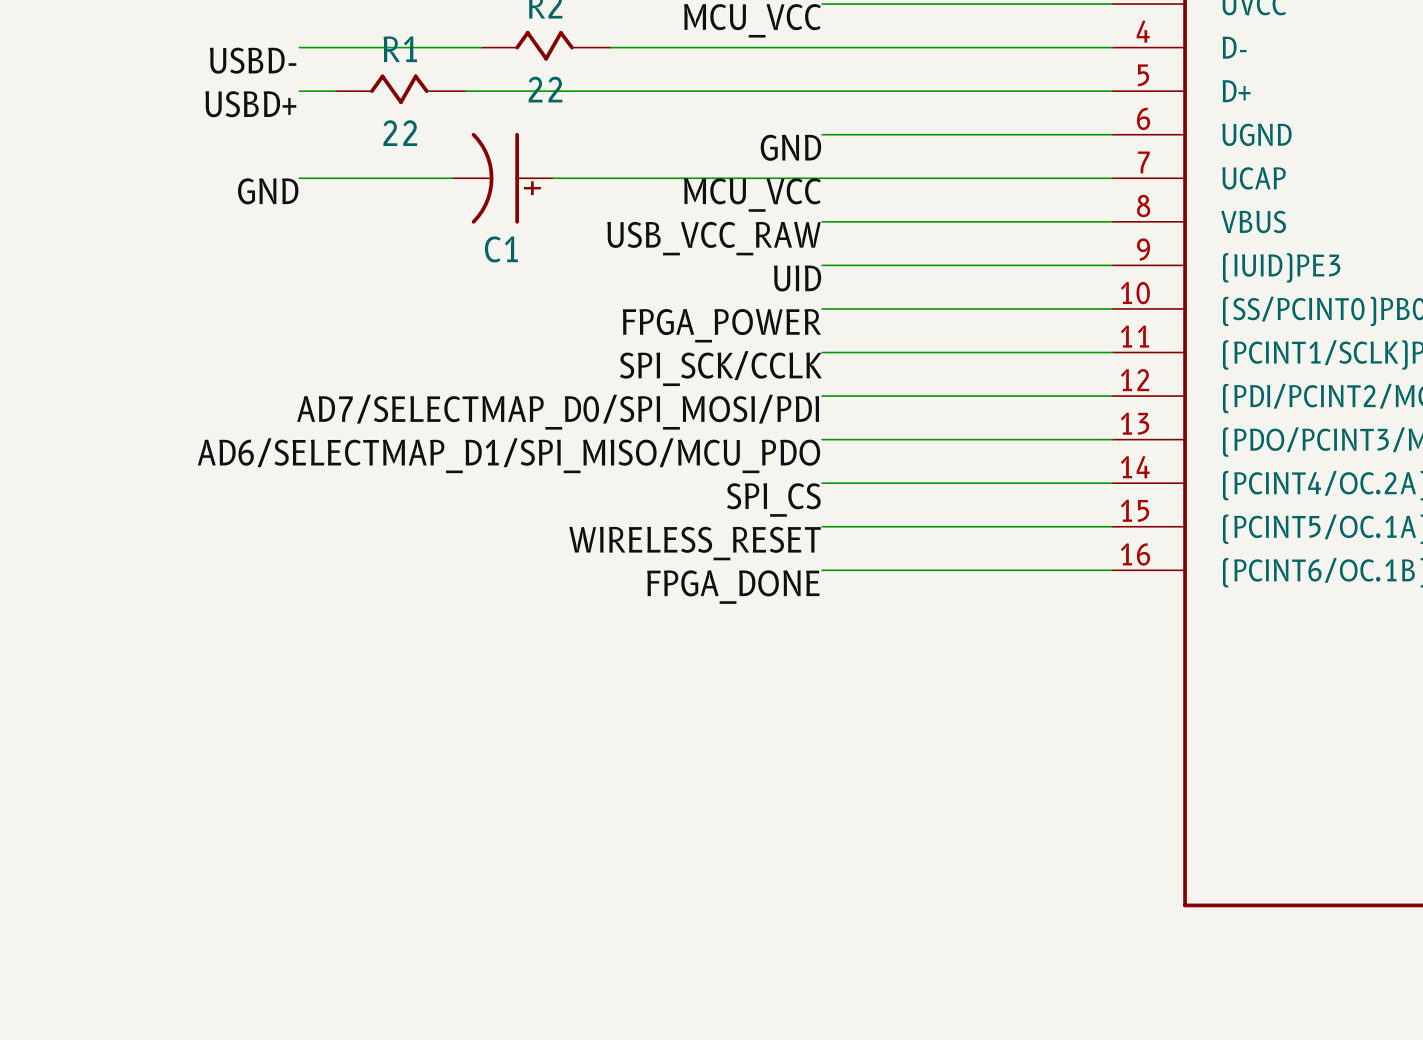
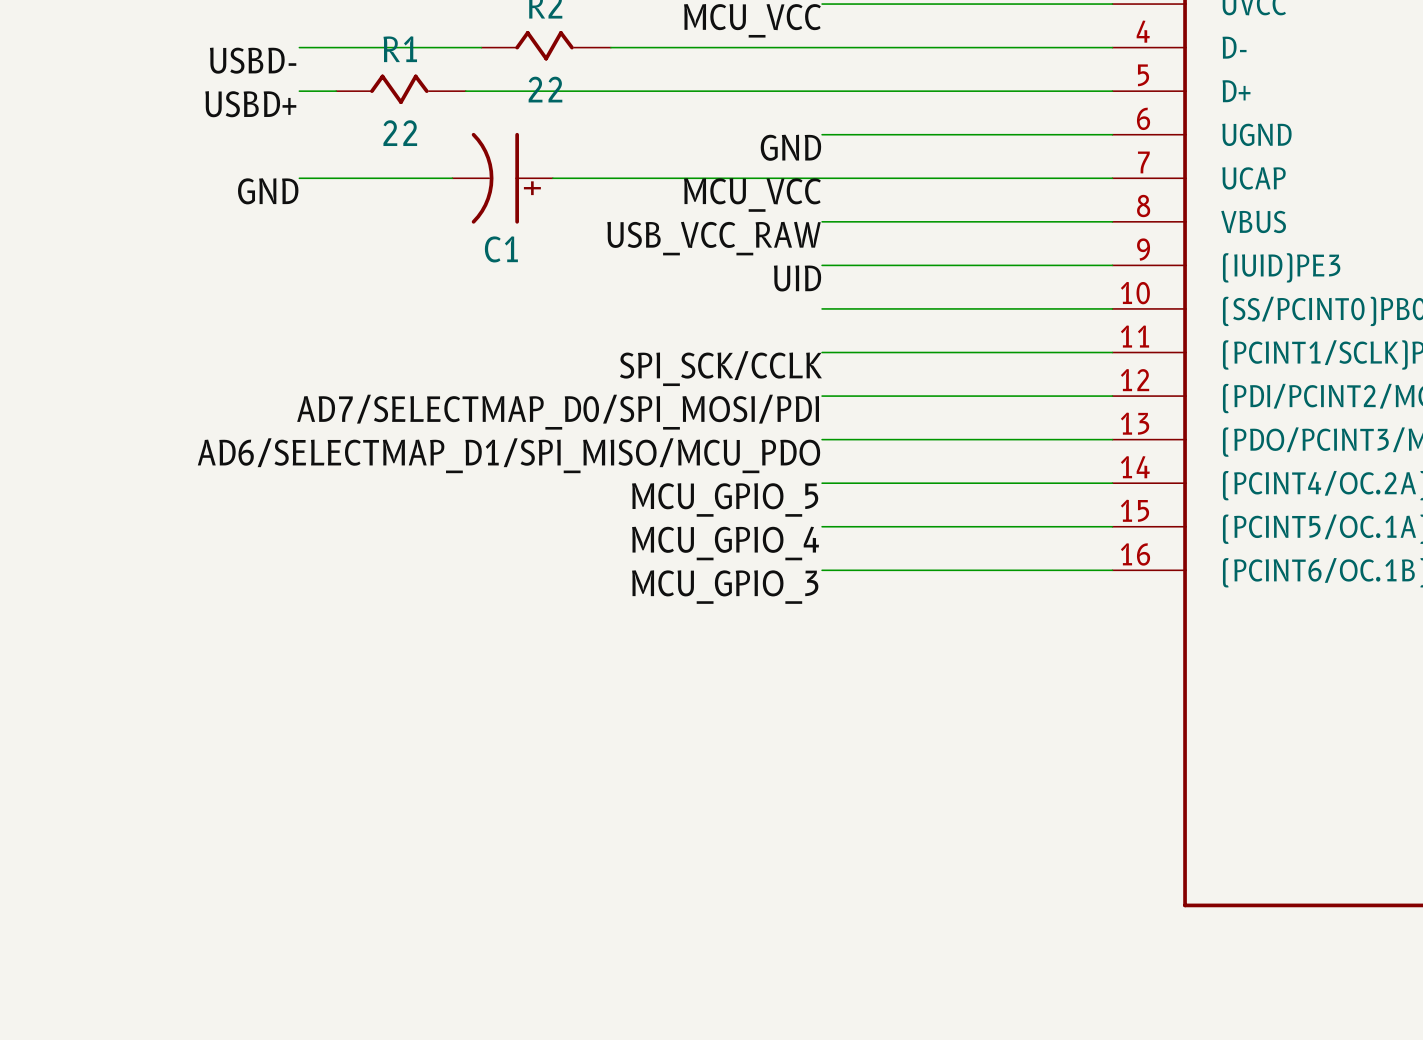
label: FPGA_POWER (721, 325) -> none
label: SPI_CS (773, 499) -> MCU_GPIO_5 (725, 499)
label: WIRELESS_RESET (695, 543) -> MCU_GPIO_4 (725, 543)
label: FPGA_DONE (733, 587) -> MCU_GPIO_3 (725, 587)

